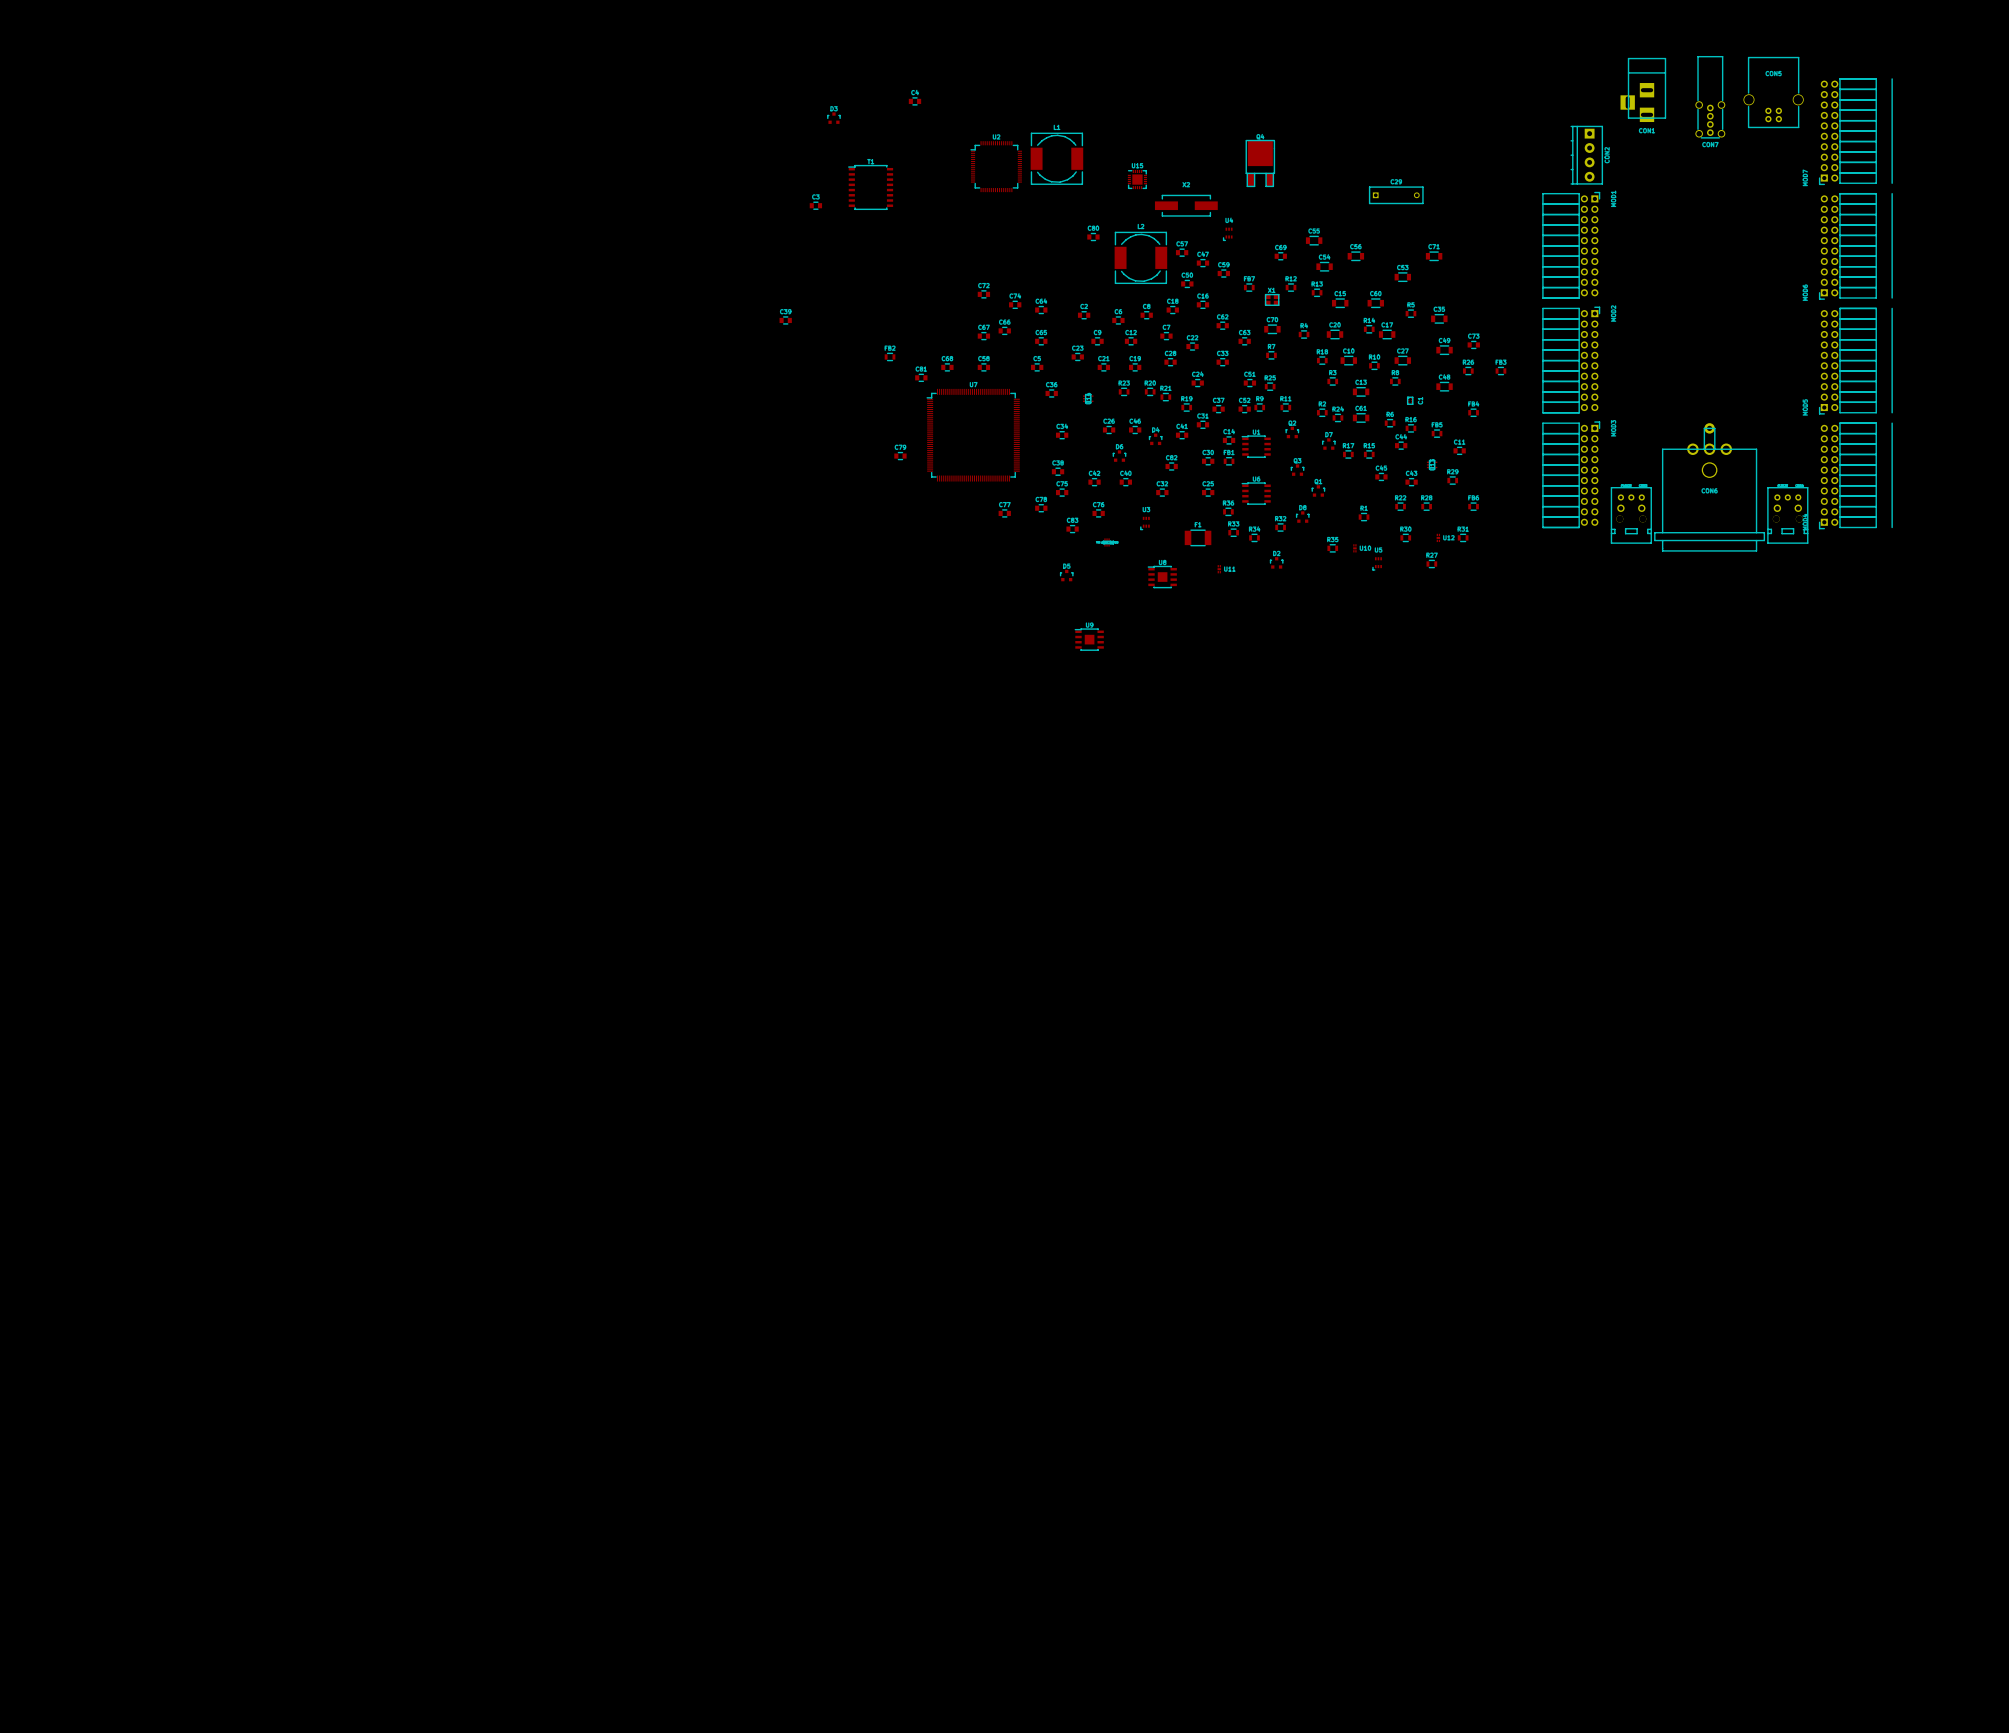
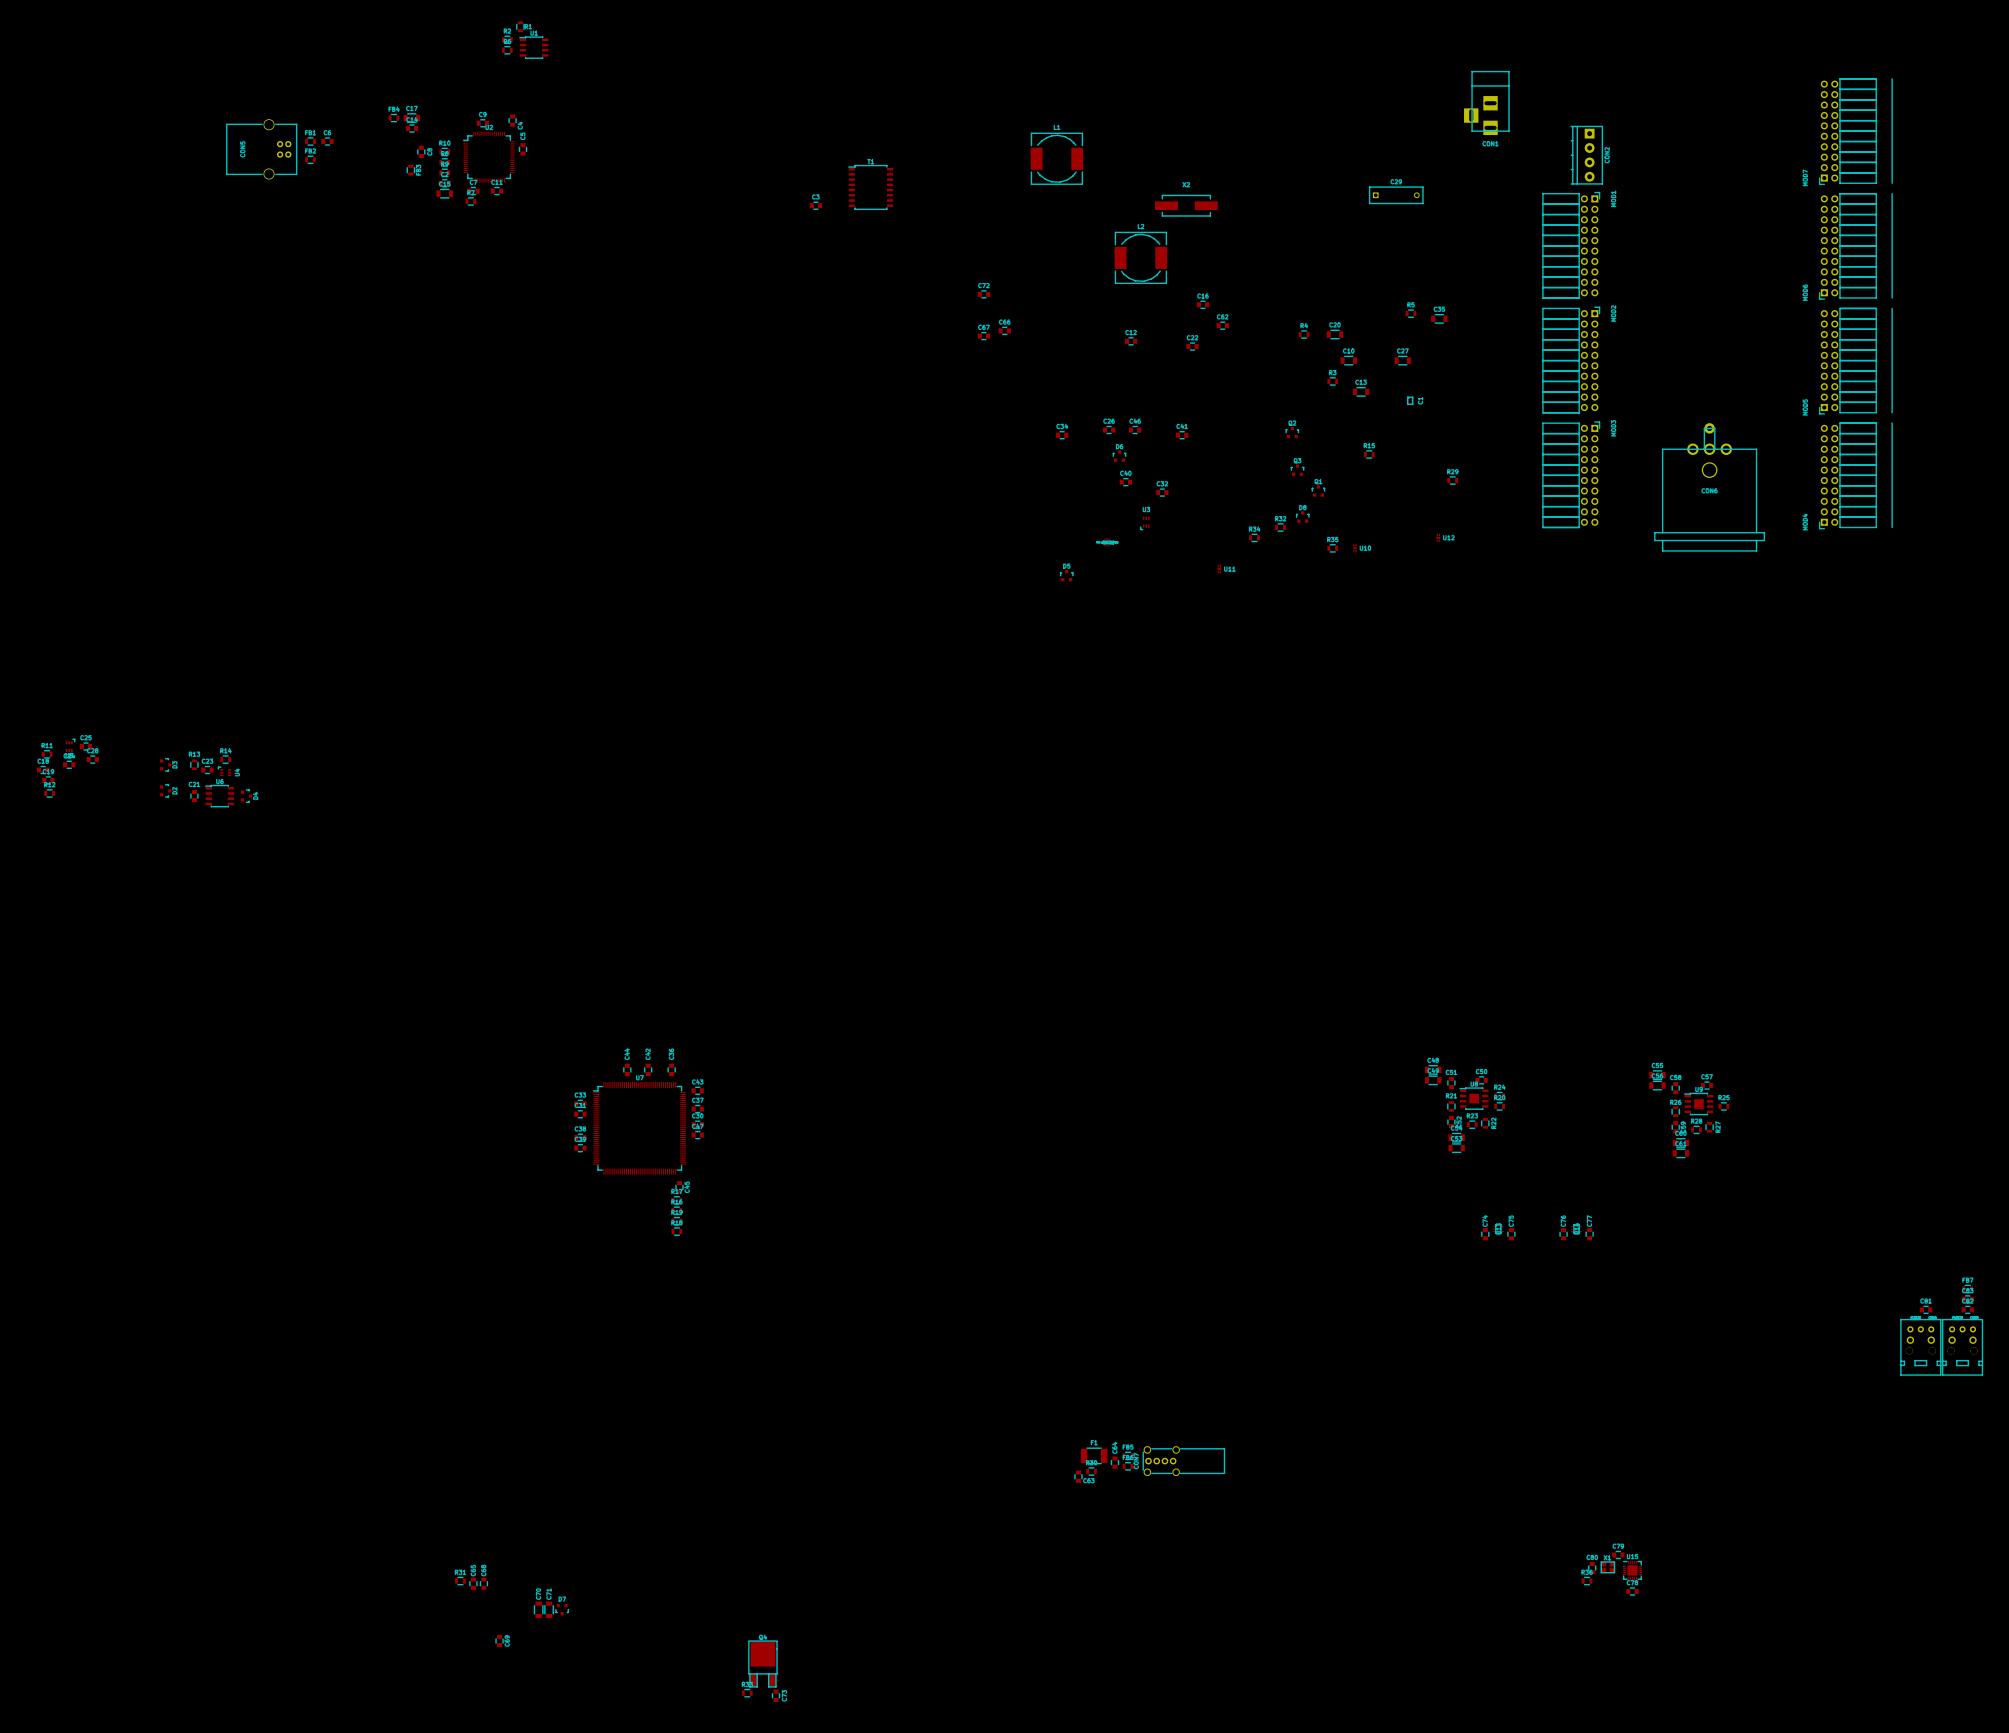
part position: (1643, 90) -> (1486, 103)
part rotation: 0° (1773, 92) -> 90° counterclockwise (261, 149)
part position: (1773, 92) -> (261, 149)
part rotation: 0° (1710, 97) -> 90° clockwise (1183, 1461)
part position: (1710, 97) -> (1183, 1461)
part rotation: 0° (914, 101) -> 90° clockwise (512, 120)
part position: (914, 101) -> (512, 120)
part rotation: 0° (833, 118) -> 90° clockwise (165, 764)
part position: (833, 118) -> (165, 764)
part position: (1260, 163) -> (762, 1663)
part position: (996, 166) -> (488, 157)
part position: (1137, 179) -> (1632, 1570)
part rotation: 0° (1227, 234) -> 90° clockwise (224, 771)
part position: (1227, 234) -> (224, 771)
part rotation: 0° (1093, 237) -> 90° clockwise (1592, 1568)
part position: (1093, 237) -> (1592, 1568)
part position: (1314, 240) -> (1657, 1075)
part position: (1182, 252) -> (1706, 1085)
part rotation: 0° (1280, 256) -> 90° clockwise (499, 1641)
part position: (1280, 256) -> (499, 1641)
part position: (1355, 256) -> (1657, 1085)
part rotation: 0° (1434, 256) -> 90° clockwise (549, 1609)
part position: (1434, 256) -> (549, 1609)
part position: (1202, 263) -> (697, 1135)
part position: (1324, 266) -> (1456, 1137)
part rotation: 0° (1223, 273) -> 90° clockwise (1675, 1127)
part position: (1223, 273) -> (1675, 1127)
part position: (1402, 277) -> (1456, 1148)
part position: (1187, 283) -> (1481, 1080)
part position: (1249, 287) -> (1967, 1288)
part position: (1291, 287) -> (49, 793)
part rotation: 0° (1317, 292) -> 90° clockwise (194, 764)
part position: (1317, 292) -> (194, 764)
part position: (1272, 299) -> (1607, 1567)
part position: (1340, 303) -> (444, 193)
part position: (1375, 303) -> (1680, 1142)
part rotation: 0° (1015, 304) -> 90° clockwise (1485, 1234)
part position: (1015, 304) -> (1485, 1234)
part rotation: 0° (1041, 310) -> 90° clockwise (1114, 1462)
part position: (1041, 310) -> (1114, 1462)
part position: (1172, 310) -> (43, 770)
part position: (1084, 315) -> (444, 183)
part rotation: 0° (1146, 315) -> 90° clockwise (421, 151)
part position: (1146, 315) -> (421, 151)
part position: (785, 320) -> (580, 1148)
part position: (1118, 320) -> (327, 141)
part rotation: 0° (1272, 329) -> 90° clockwise (538, 1609)
part position: (1272, 329) -> (538, 1609)
part position: (1369, 329) -> (225, 759)
part position: (1387, 334) -> (411, 118)
part position: (1166, 336) -> (473, 191)
part rotation: 0° (1041, 341) -> 90° clockwise (473, 1583)
part position: (1041, 341) -> (473, 1583)
part position: (1097, 341) -> (482, 123)
part rotation: 0° (1244, 341) -> 90° clockwise (1078, 1476)
part position: (1244, 341) -> (1078, 1476)
part rotation: 0° (1473, 344) -> 90° clockwise (775, 1695)
part position: (1473, 344) -> (775, 1695)
part position: (1444, 350) -> (1433, 1080)
part position: (1271, 355) -> (470, 201)
part position: (890, 356) -> (310, 159)
part position: (1077, 356) -> (207, 770)
part position: (1322, 360) -> (676, 1231)
part position: (1170, 362) -> (92, 759)
part position: (1222, 362) -> (580, 1103)
part position: (1374, 365) -> (444, 151)
part rotation: 0° (947, 367) -> 90° clockwise (483, 1583)
part position: (947, 367) -> (483, 1583)
part rotation: 0° (983, 367) -> 90° clockwise (1675, 1088)
part position: (983, 367) -> (1675, 1088)
part rotation: 0° (1037, 367) -> 90° clockwise (523, 149)
part position: (1037, 367) -> (523, 149)
part rotation: 0° (1103, 367) -> 90° clockwise (194, 796)
part position: (1103, 367) -> (194, 796)
part position: (1135, 367) -> (48, 780)
part rotation: 0° (1468, 371) -> 90° clockwise (1675, 1111)
part position: (1468, 371) -> (1675, 1111)
part rotation: 0° (1500, 371) -> 90° clockwise (410, 170)
part position: (1500, 371) -> (410, 170)
part position: (921, 377) -> (1926, 1309)
part position: (1395, 381) -> (444, 162)
part position: (1197, 383) -> (69, 764)
part rotation: 0° (1249, 383) -> 90° clockwise (1451, 1082)
part position: (1249, 383) -> (1451, 1082)
part position: (1270, 386) -> (1723, 1106)
part position: (1444, 386) -> (1433, 1069)
part position: (1124, 391) -> (1472, 1124)
part position: (1150, 391) -> (1499, 1106)
part rotation: 0° (1051, 393) -> 90° clockwise (671, 1069)
part position: (1051, 393) -> (671, 1069)
part rotation: 0° (1165, 397) -> 90° clockwise (1451, 1106)
part position: (1165, 397) -> (1451, 1106)
part position: (1088, 398) -> (1576, 1229)
part position: (1186, 407) -> (676, 1221)
part position: (1259, 407) -> (444, 172)
part position: (1285, 407) -> (47, 754)
part position: (1218, 409) -> (697, 1109)
part rotation: 0° (1244, 409) -> 90° clockwise (1451, 1122)
part position: (1244, 409) -> (1451, 1122)
part position: (1322, 412) -> (507, 39)
part position: (1473, 412) -> (393, 118)
part position: (1337, 417) -> (1499, 1096)
part position: (1361, 417) -> (1680, 1153)
part position: (1390, 423) -> (507, 50)
part position: (1202, 424) -> (580, 1114)
part position: (1410, 428) -> (676, 1210)
part position: (1437, 433) -> (1128, 1455)
part position: (973, 435) -> (639, 1128)
part rotation: 0° (1155, 439) -> 90° clockwise (246, 796)
part position: (1155, 439) -> (246, 796)
part position: (1229, 440) -> (411, 128)
part rotation: 0° (1328, 444) -> 180° (562, 1609)
part position: (1328, 444) -> (562, 1609)
part rotation: 0° (1401, 445) -> 90° clockwise (627, 1069)
part position: (1401, 445) -> (627, 1069)
part position: (1256, 446) -> (533, 47)
part position: (1459, 450) -> (496, 191)
part position: (1348, 454) -> (676, 1200)
part position: (900, 456) -> (1618, 1554)
part position: (1208, 461) -> (697, 1124)
part position: (1229, 461) -> (310, 141)
part position: (1432, 464) -> (1498, 1229)
part position: (1171, 466) -> (1967, 1309)
part position: (1058, 471) -> (580, 1137)
part rotation: 0° (1381, 476) -> 90° clockwise (679, 1187)
part position: (1381, 476) -> (679, 1187)
part rotation: 0° (1094, 482) -> 90° clockwise (648, 1069)
part position: (1094, 482) -> (648, 1069)
part position: (1411, 482) -> (697, 1090)
part rotation: 0° (1062, 492) -> 90° clockwise (1511, 1234)
part position: (1062, 492) -> (1511, 1234)
part position: (1208, 492) -> (86, 746)
part position: (1256, 493) -> (219, 796)
part rotation: 0° (1400, 506) -> 90° clockwise (1485, 1123)
part position: (1400, 506) -> (1485, 1123)
part position: (1426, 506) -> (1696, 1129)
part position: (1473, 506) -> (1128, 1466)
part position: (1041, 508) -> (1632, 1591)
part position: (1228, 511) -> (1587, 1581)
part rotation: 0° (1004, 513) -> 90° clockwise (1589, 1234)
part position: (1004, 513) -> (1589, 1234)
part rotation: 0° (1098, 513) -> 90° clockwise (1563, 1234)
part position: (1098, 513) -> (1563, 1234)
part position: (1631, 515) -> (1962, 1347)
part position: (1787, 515) -> (1920, 1347)
part rotation: 0° (1364, 517) -> 90° clockwise (520, 26)
part position: (1364, 517) -> (520, 26)
part position: (1072, 529) -> (1967, 1299)
part position: (1233, 532) -> (747, 1693)
part position: (1198, 537) -> (1094, 1455)
part position: (1405, 537) -> (1091, 1471)
part position: (1463, 537) -> (460, 1581)
part rotation: 0° (1276, 562) -> 90° clockwise (165, 790)
part position: (1276, 562) -> (165, 790)
part rotation: 0° (1377, 563) -> 180° (70, 745)
part position: (1377, 563) -> (70, 745)
part rotation: 0° (1431, 564) -> 90° clockwise (1709, 1127)
part position: (1431, 564) -> (1709, 1127)
part position: (1162, 577) -> (1474, 1098)
part position: (1089, 639) -> (1698, 1104)

